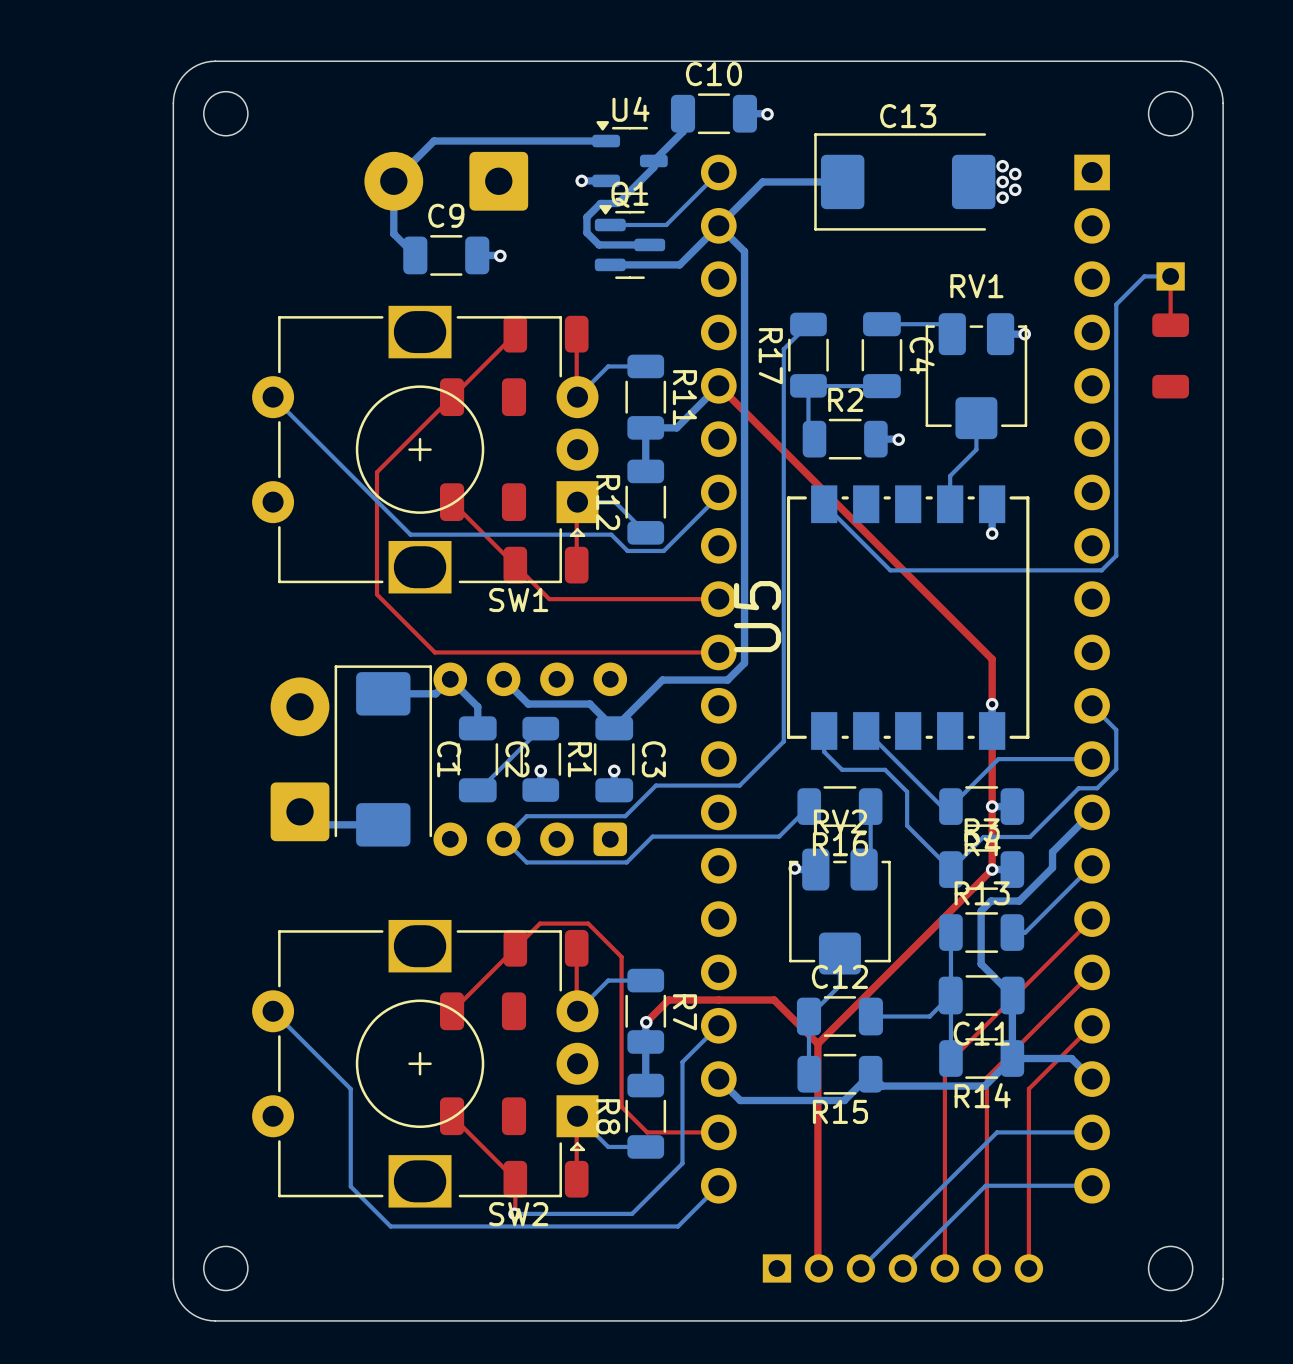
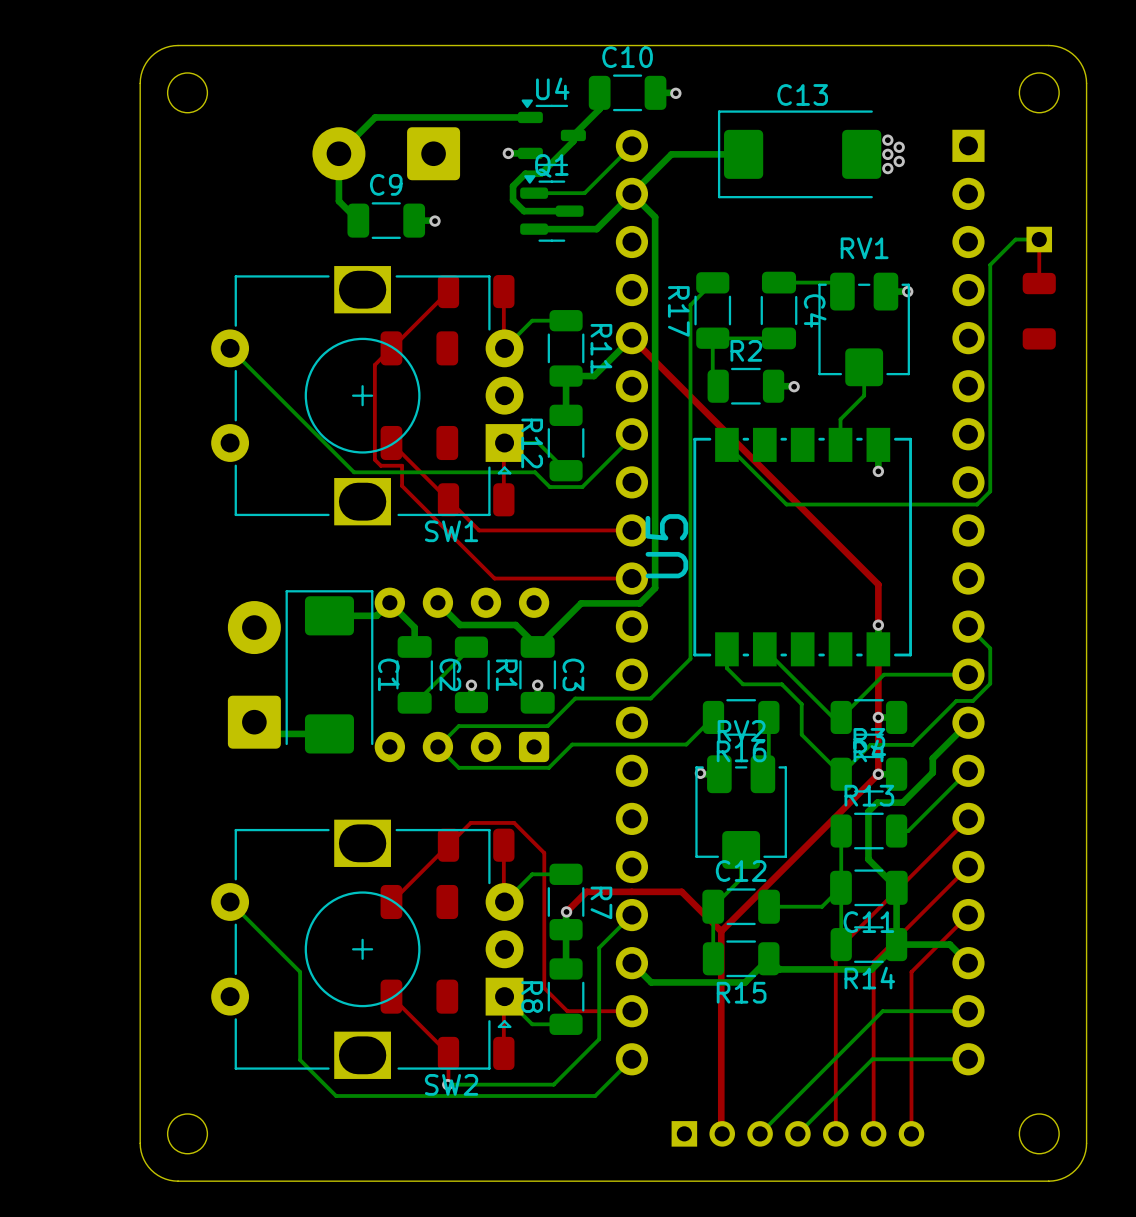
top track: (433, 415) (377, 472) (377, 594) (434, 652) (566, 652) -> (374, 364) (374, 459) (380, 465) (402, 465) (402, 485) (494, 578)

